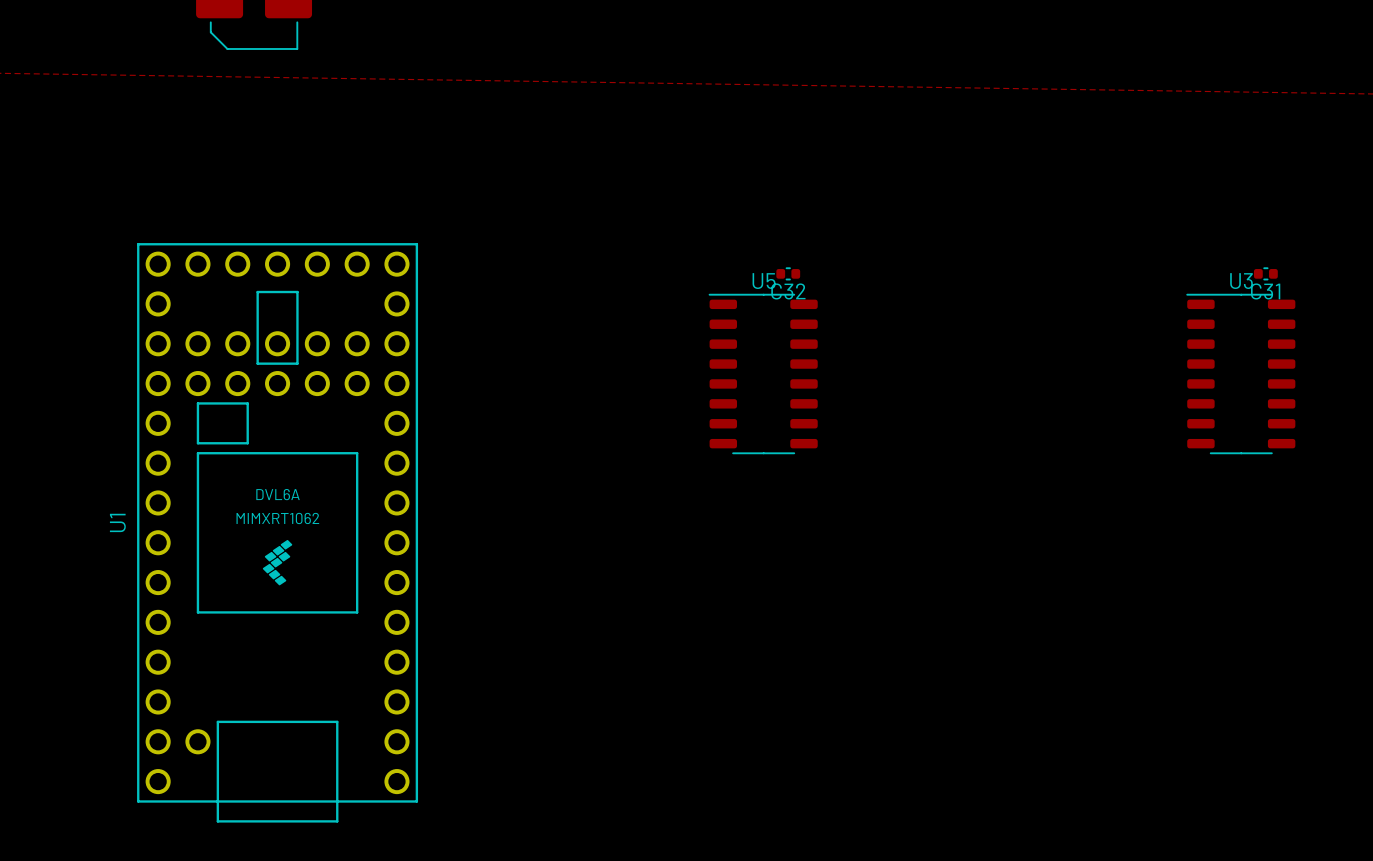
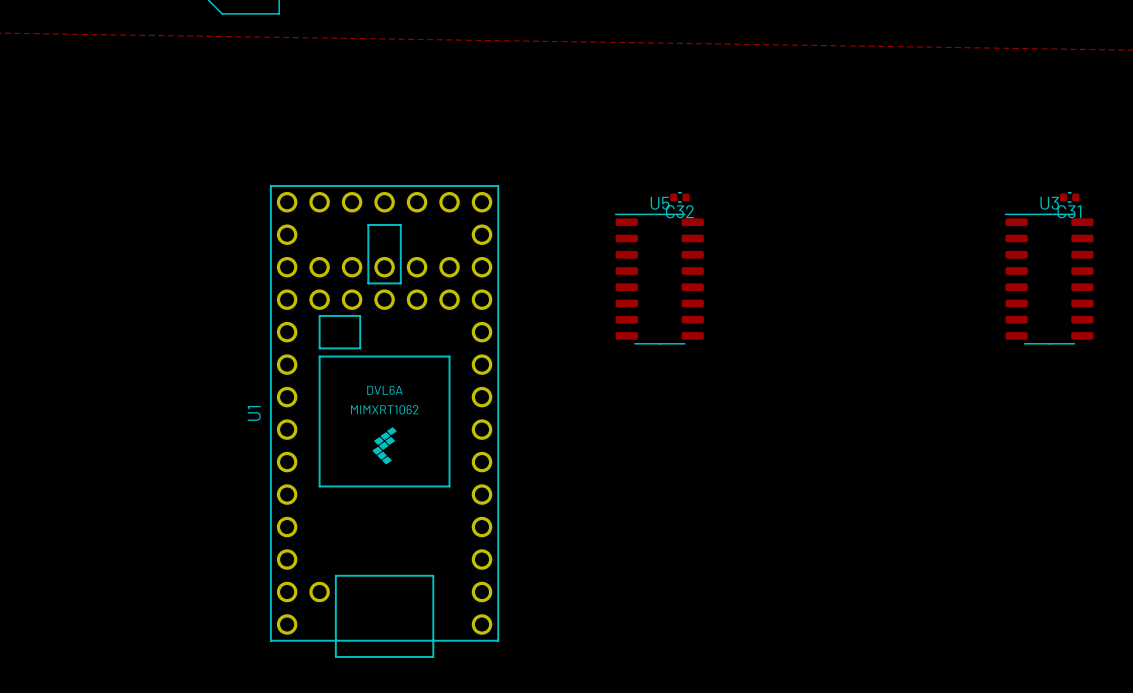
U1 position: (277, 532) -> (384, 421)

